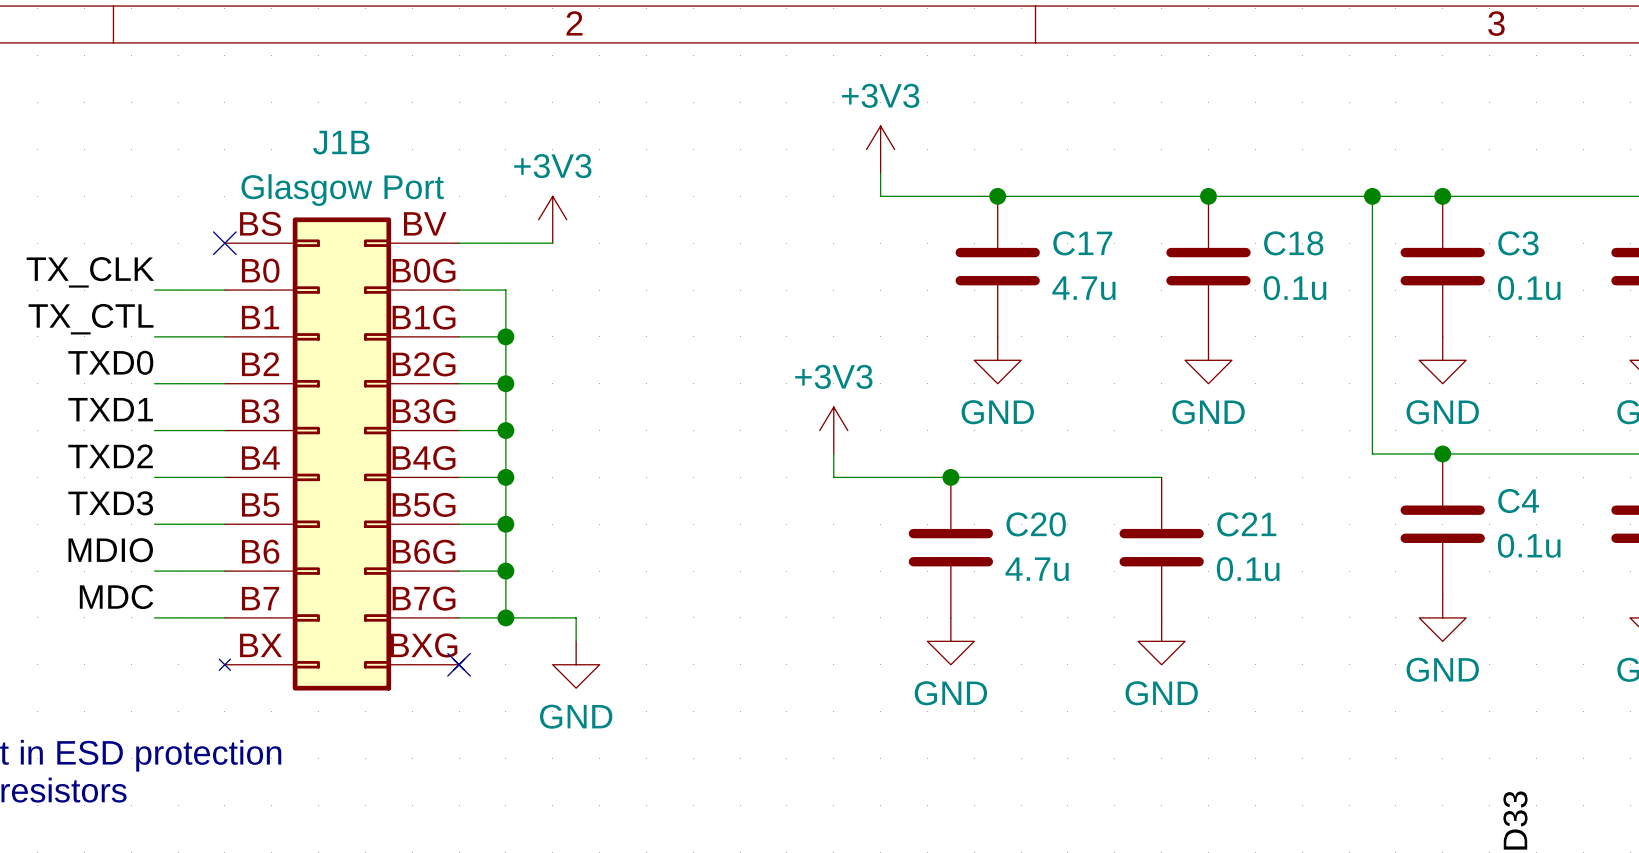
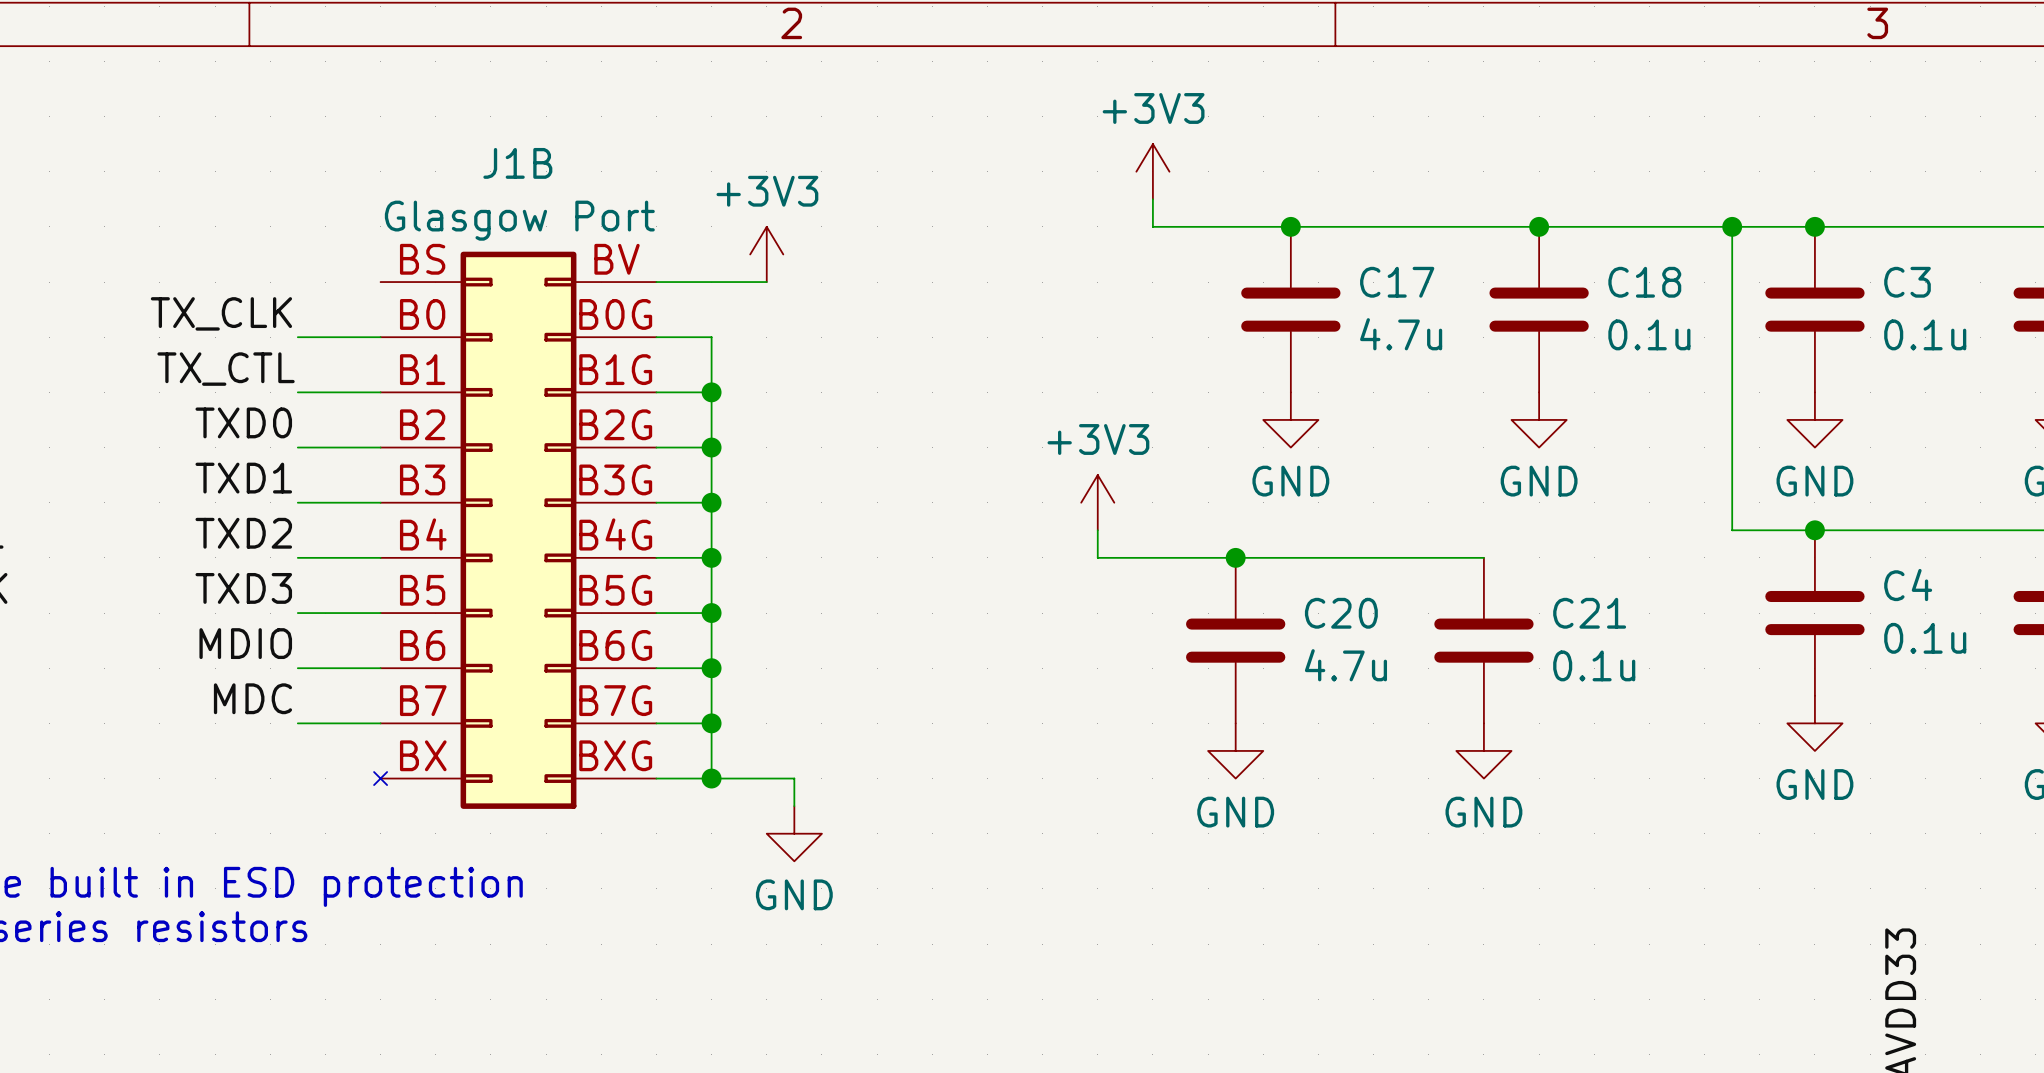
J1B symbol: [219, 217, 465, 691] -> [374, 251, 657, 809]
no-connect mark: (224, 243) -> none
wire: (505, 617) (576, 617) (576, 641) -> (711, 723) (711, 778)
wire: none -> (656, 778) (794, 778) (794, 806)
no-connect mark: (459, 664) -> none
junction: none -> (711, 778)
power symbol position: GND (576, 664) -> GND (794, 833)

